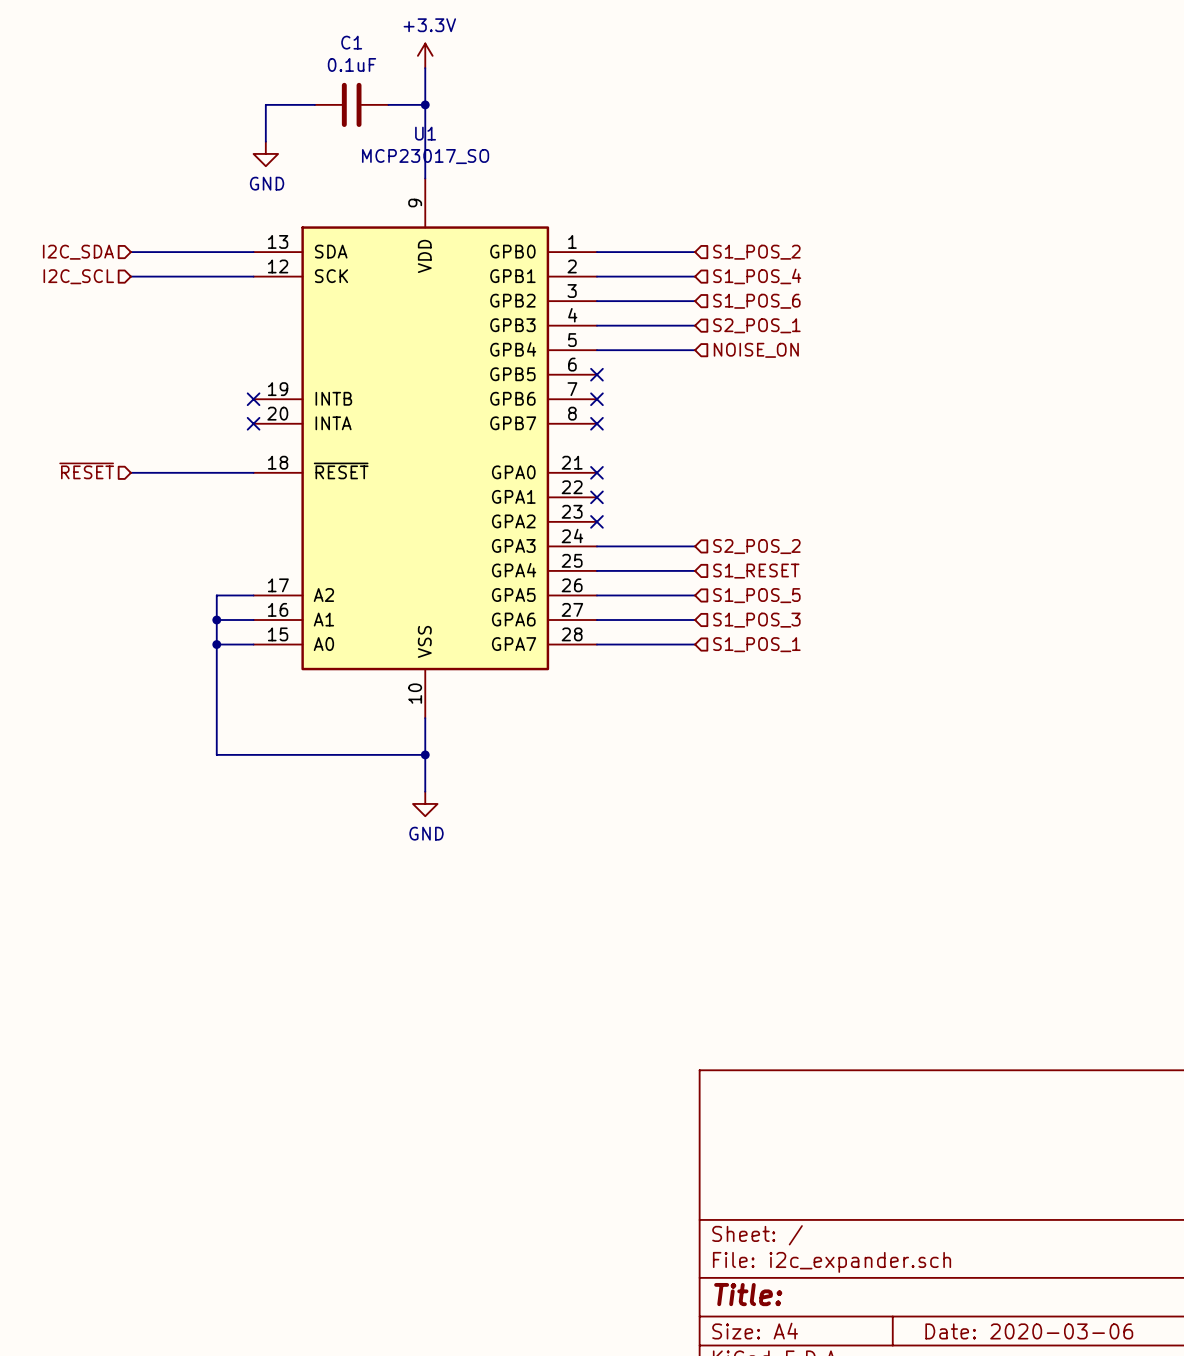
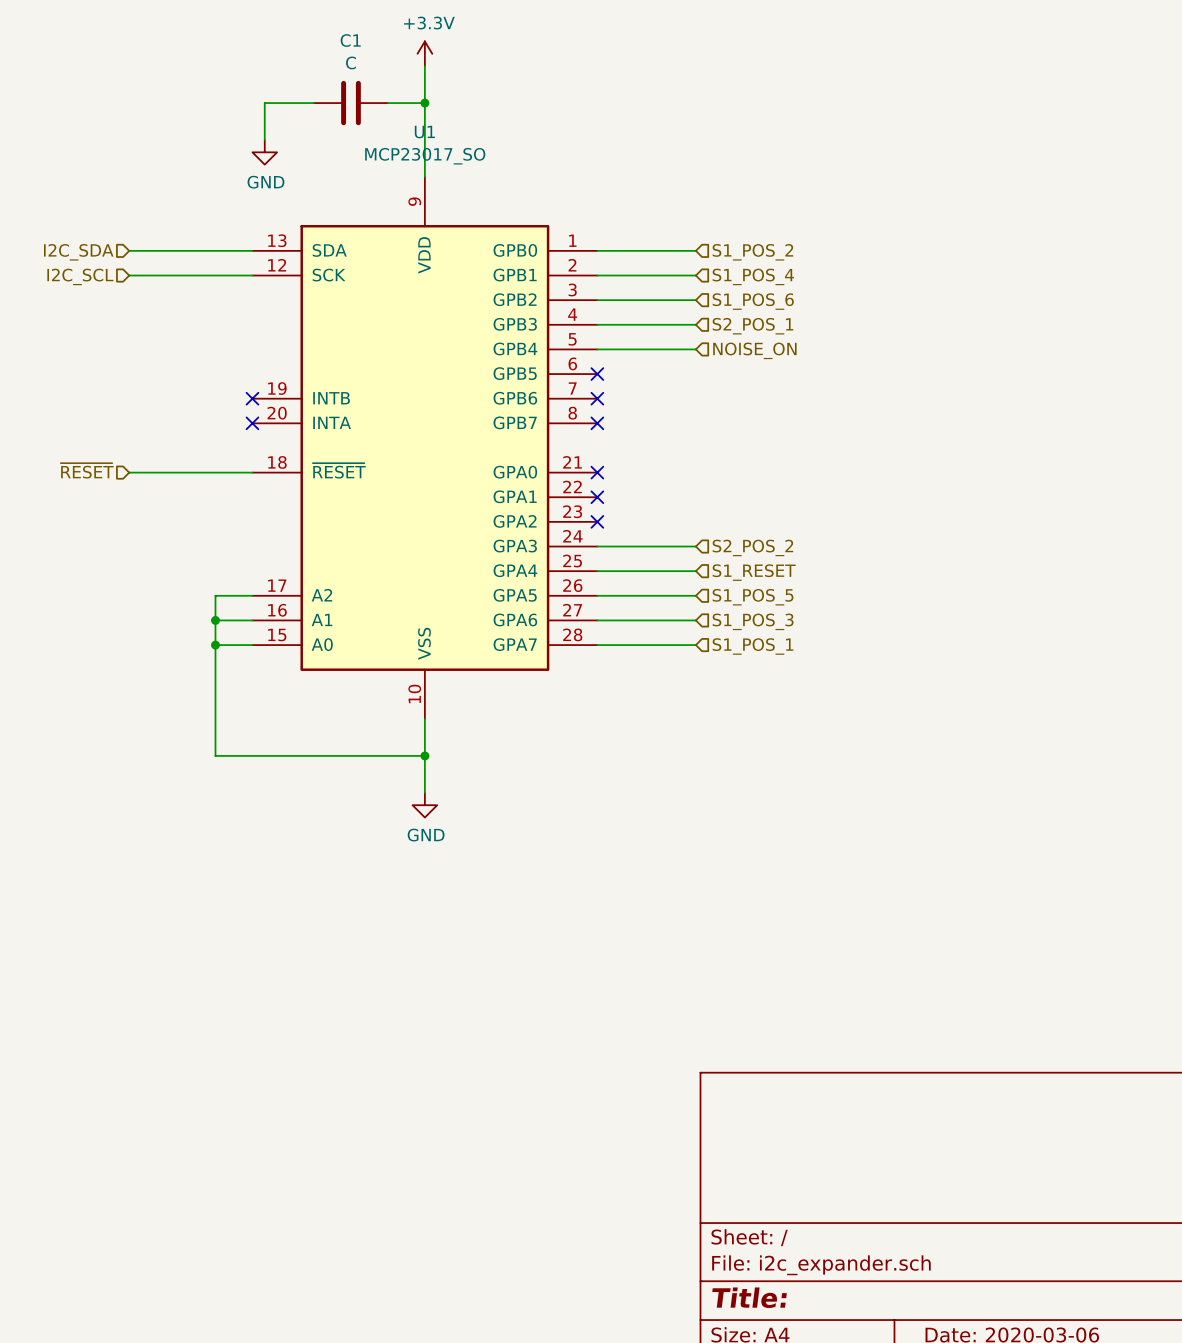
C1 value: 0.1uF (351, 64) -> C (351, 62)

